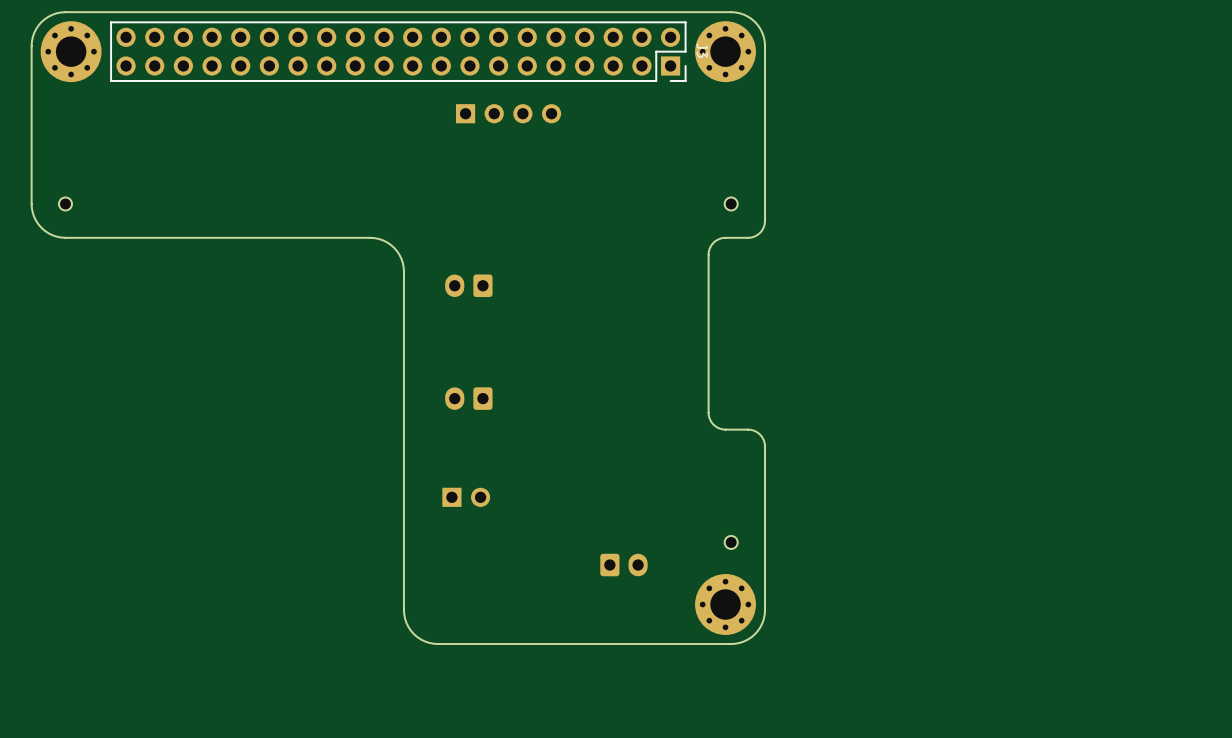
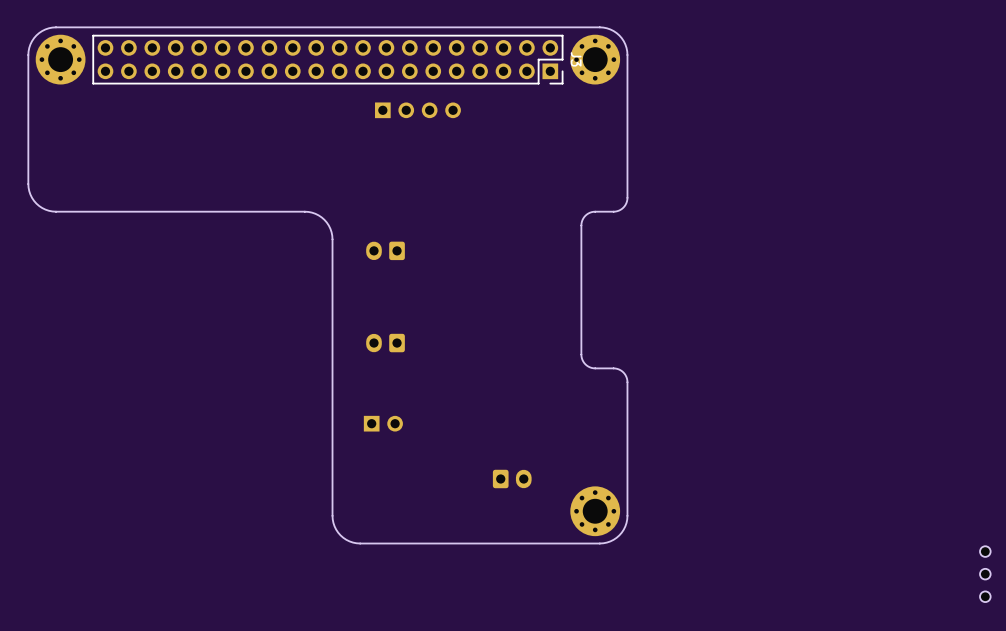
part: (65, 203) -> none
part: (731, 203) -> none
part: (731, 542) -> none
part: none -> (985, 551)
part: none -> (985, 574)
part: none -> (985, 596)

